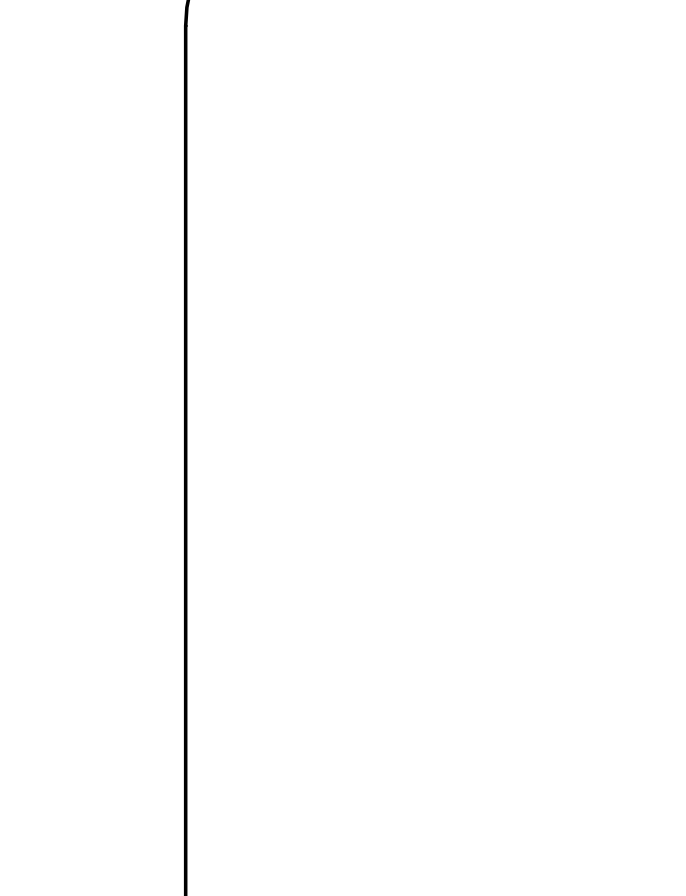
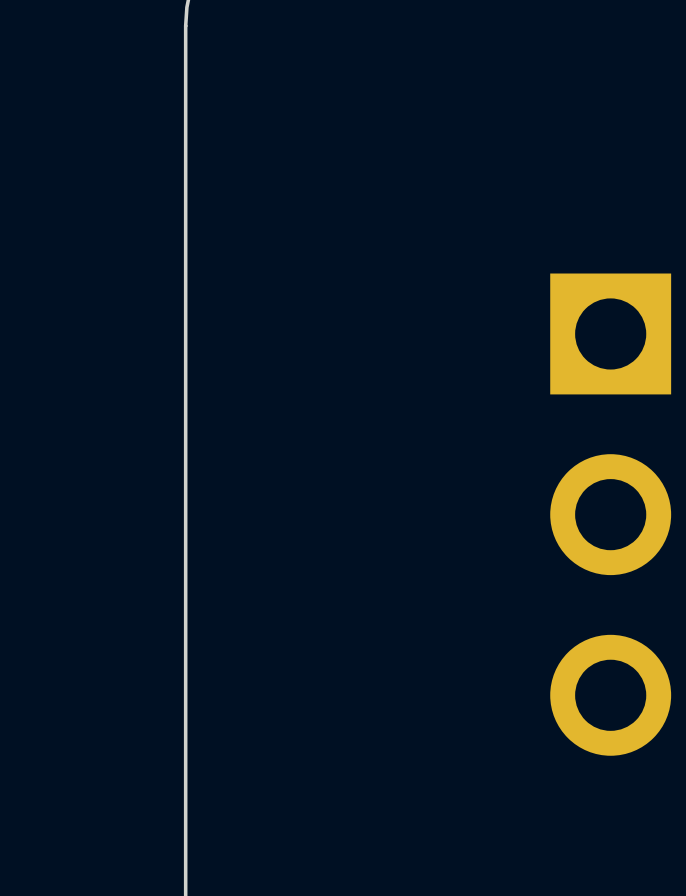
part: none -> (610, 514)

